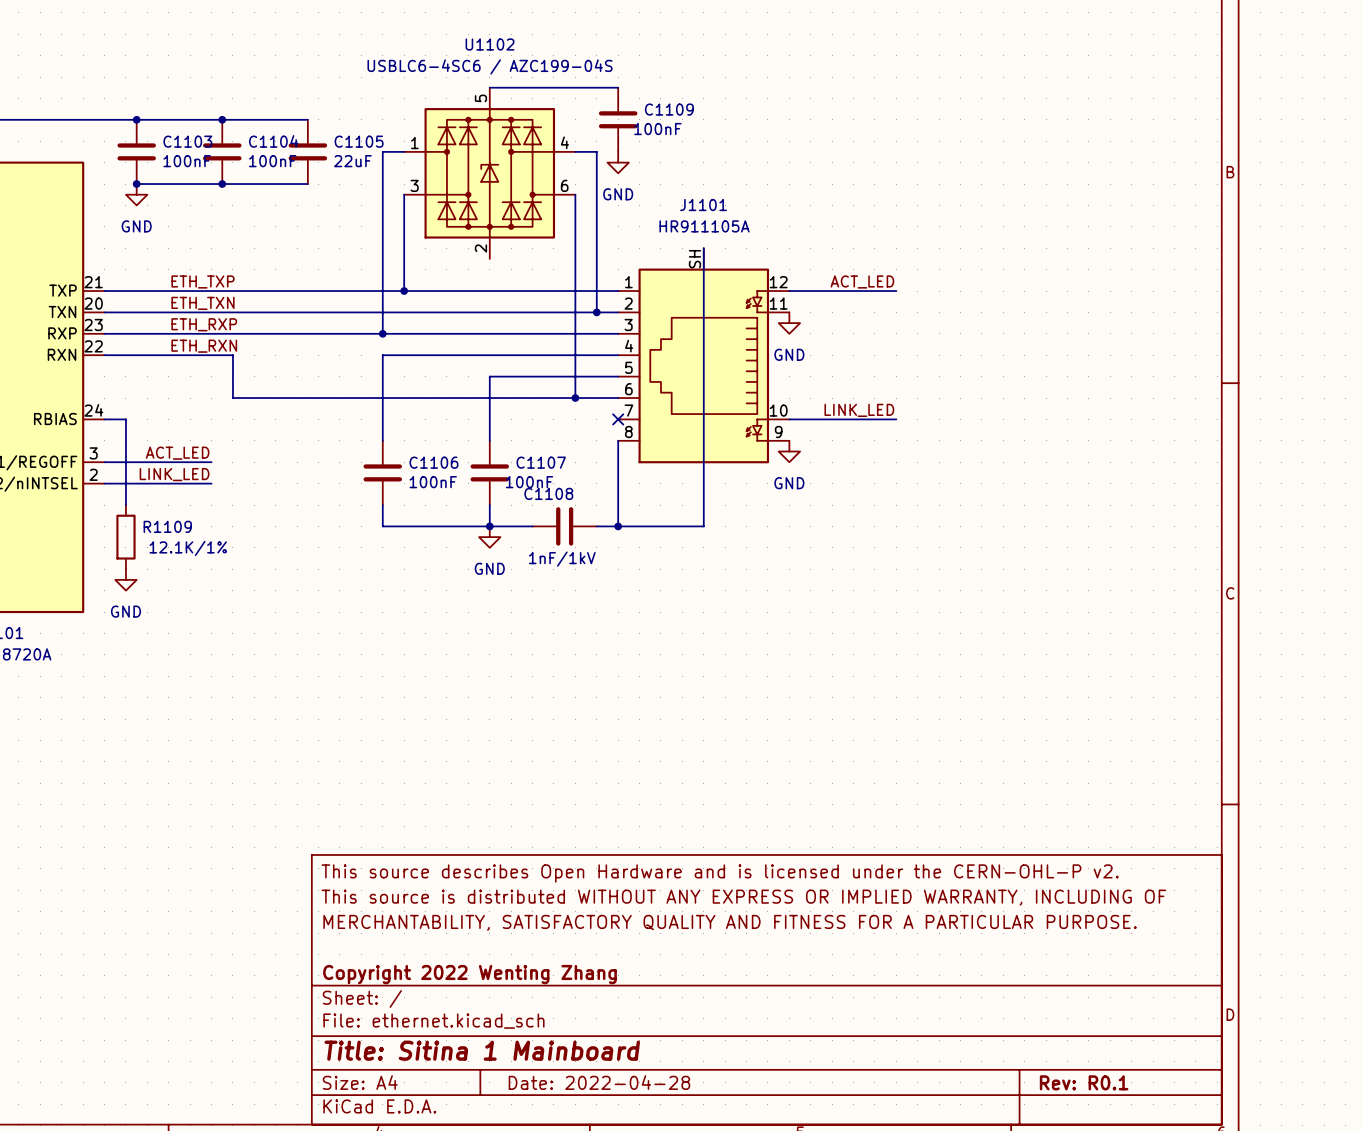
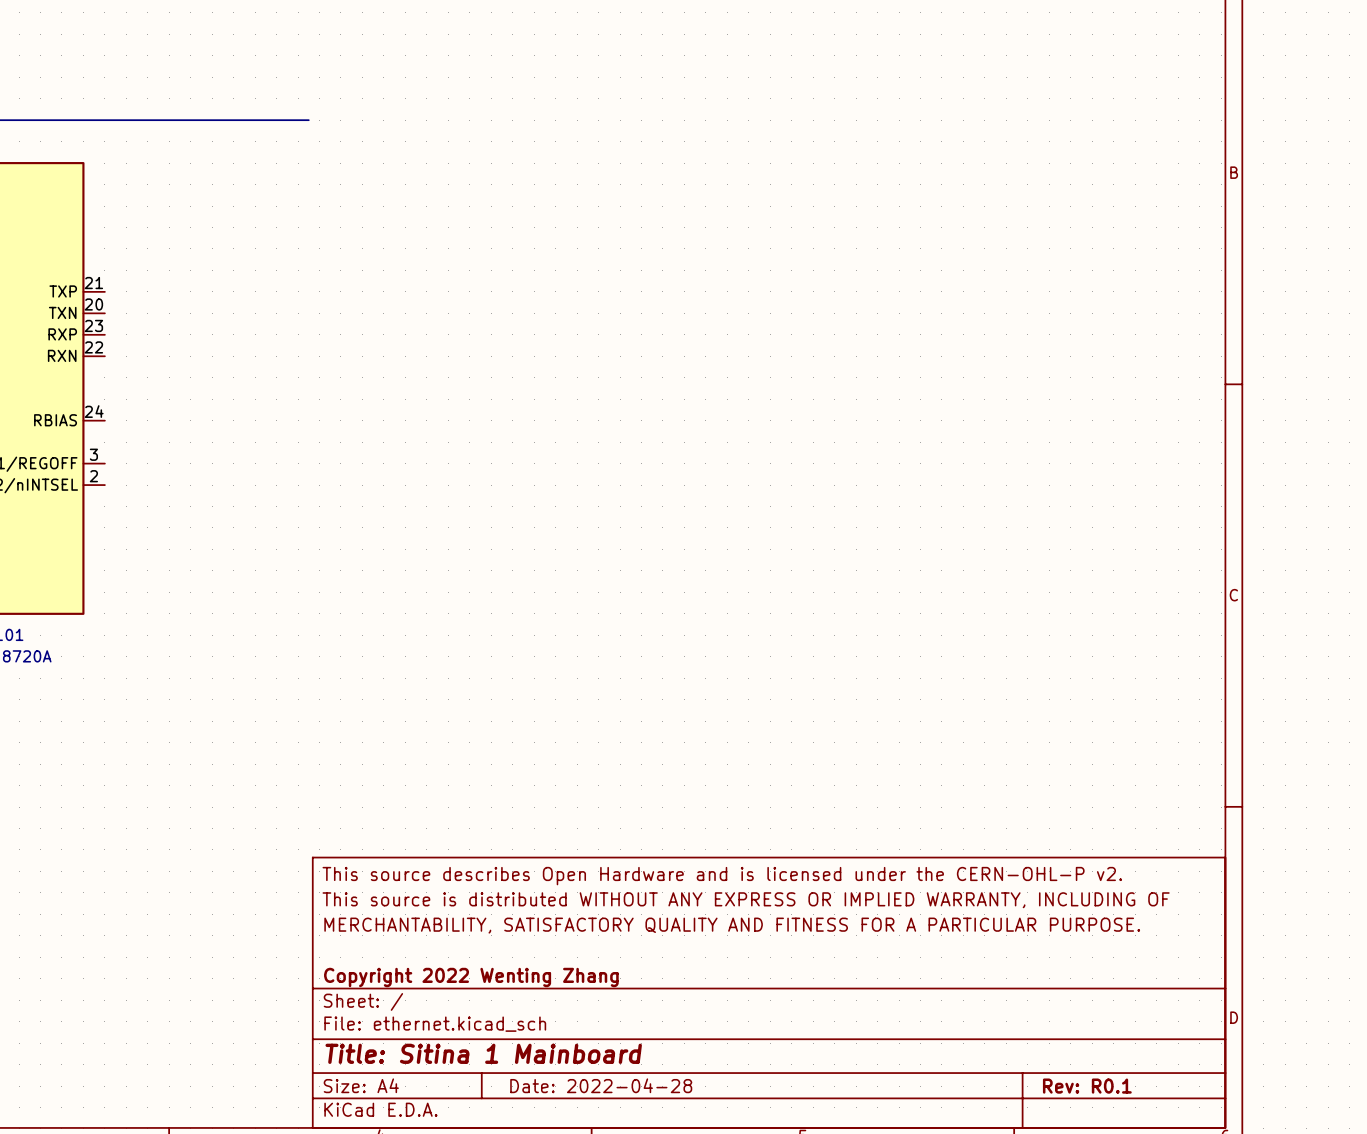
wire: (489, 87) (618, 87) -> none
junction: (136, 119) -> none
junction: (222, 119) -> none
C1109: 100nF (618, 119) -> none
C1103: 100nF (136, 151) -> none
C1104: 100nF (222, 151) -> none
C1105: 22uF (307, 151) -> none
wire: (404, 151) (382, 151) (382, 333) -> none
wire: (575, 151) (596, 151) (596, 312) -> none
power symbol: GND (618, 162) -> none
U1102: USBLC6-4SC6 / AZC199-04S (489, 173) -> none
wire: (136, 184) (307, 184) -> none
junction: (136, 184) -> none
junction: (222, 184) -> none
power symbol: GND (136, 194) -> none
wire: (404, 194) (404, 291) -> none
wire: (575, 194) (575, 398) -> none
wire: (703, 248) (703, 526) (596, 526) -> none
label: ETH_TXP (202, 281) -> none
label: ACT_LED (862, 281) -> none
wire: (104, 291) (618, 291) -> none
junction: (404, 291) -> none
wire: (789, 291) (896, 291) -> none
label: ETH_TXN (202, 303) -> none
wire: (104, 312) (618, 312) -> none
junction: (596, 312) -> none
power symbol: GND (789, 323) -> none
label: ETH_RXP (204, 324) -> none
wire: (104, 333) (618, 333) -> none
junction: (382, 333) -> none
label: ETH_RXN (204, 346) -> none
wire: (104, 355) (232, 355) (232, 398) (618, 398) -> none
wire: (618, 355) (382, 355) (382, 440) -> none
J1101: HR911105A (703, 355) -> none
wire: (618, 376) (489, 376) (489, 440) -> none
junction: (575, 398) -> none
label: LINK_LED (859, 410) -> none
wire: (104, 419) (125, 419) (125, 505) -> none
no-connect mark: (618, 419) -> none
wire: (789, 419) (896, 419) -> none
wire: (618, 440) (618, 526) -> none
power symbol: GND (789, 451) -> none
label: ACT_LED (177, 453) -> none
wire: (104, 462) (211, 462) -> none
C1106: 100nF (382, 472) -> none
C1107: 100nF (489, 472) -> none
label: LINK_LED (174, 474) -> none
wire: (104, 483) (211, 483) -> none
wire: (382, 505) (382, 526) (532, 526) -> none
wire: (489, 505) (489, 526) -> none
junction: (489, 526) -> none
C1108: 1nF/1kV (564, 526) -> none
junction: (618, 526) -> none
R1109: 12.1K/1% (125, 537) -> none
power symbol: GND (489, 537) -> none
power symbol: GND (125, 579) -> none

